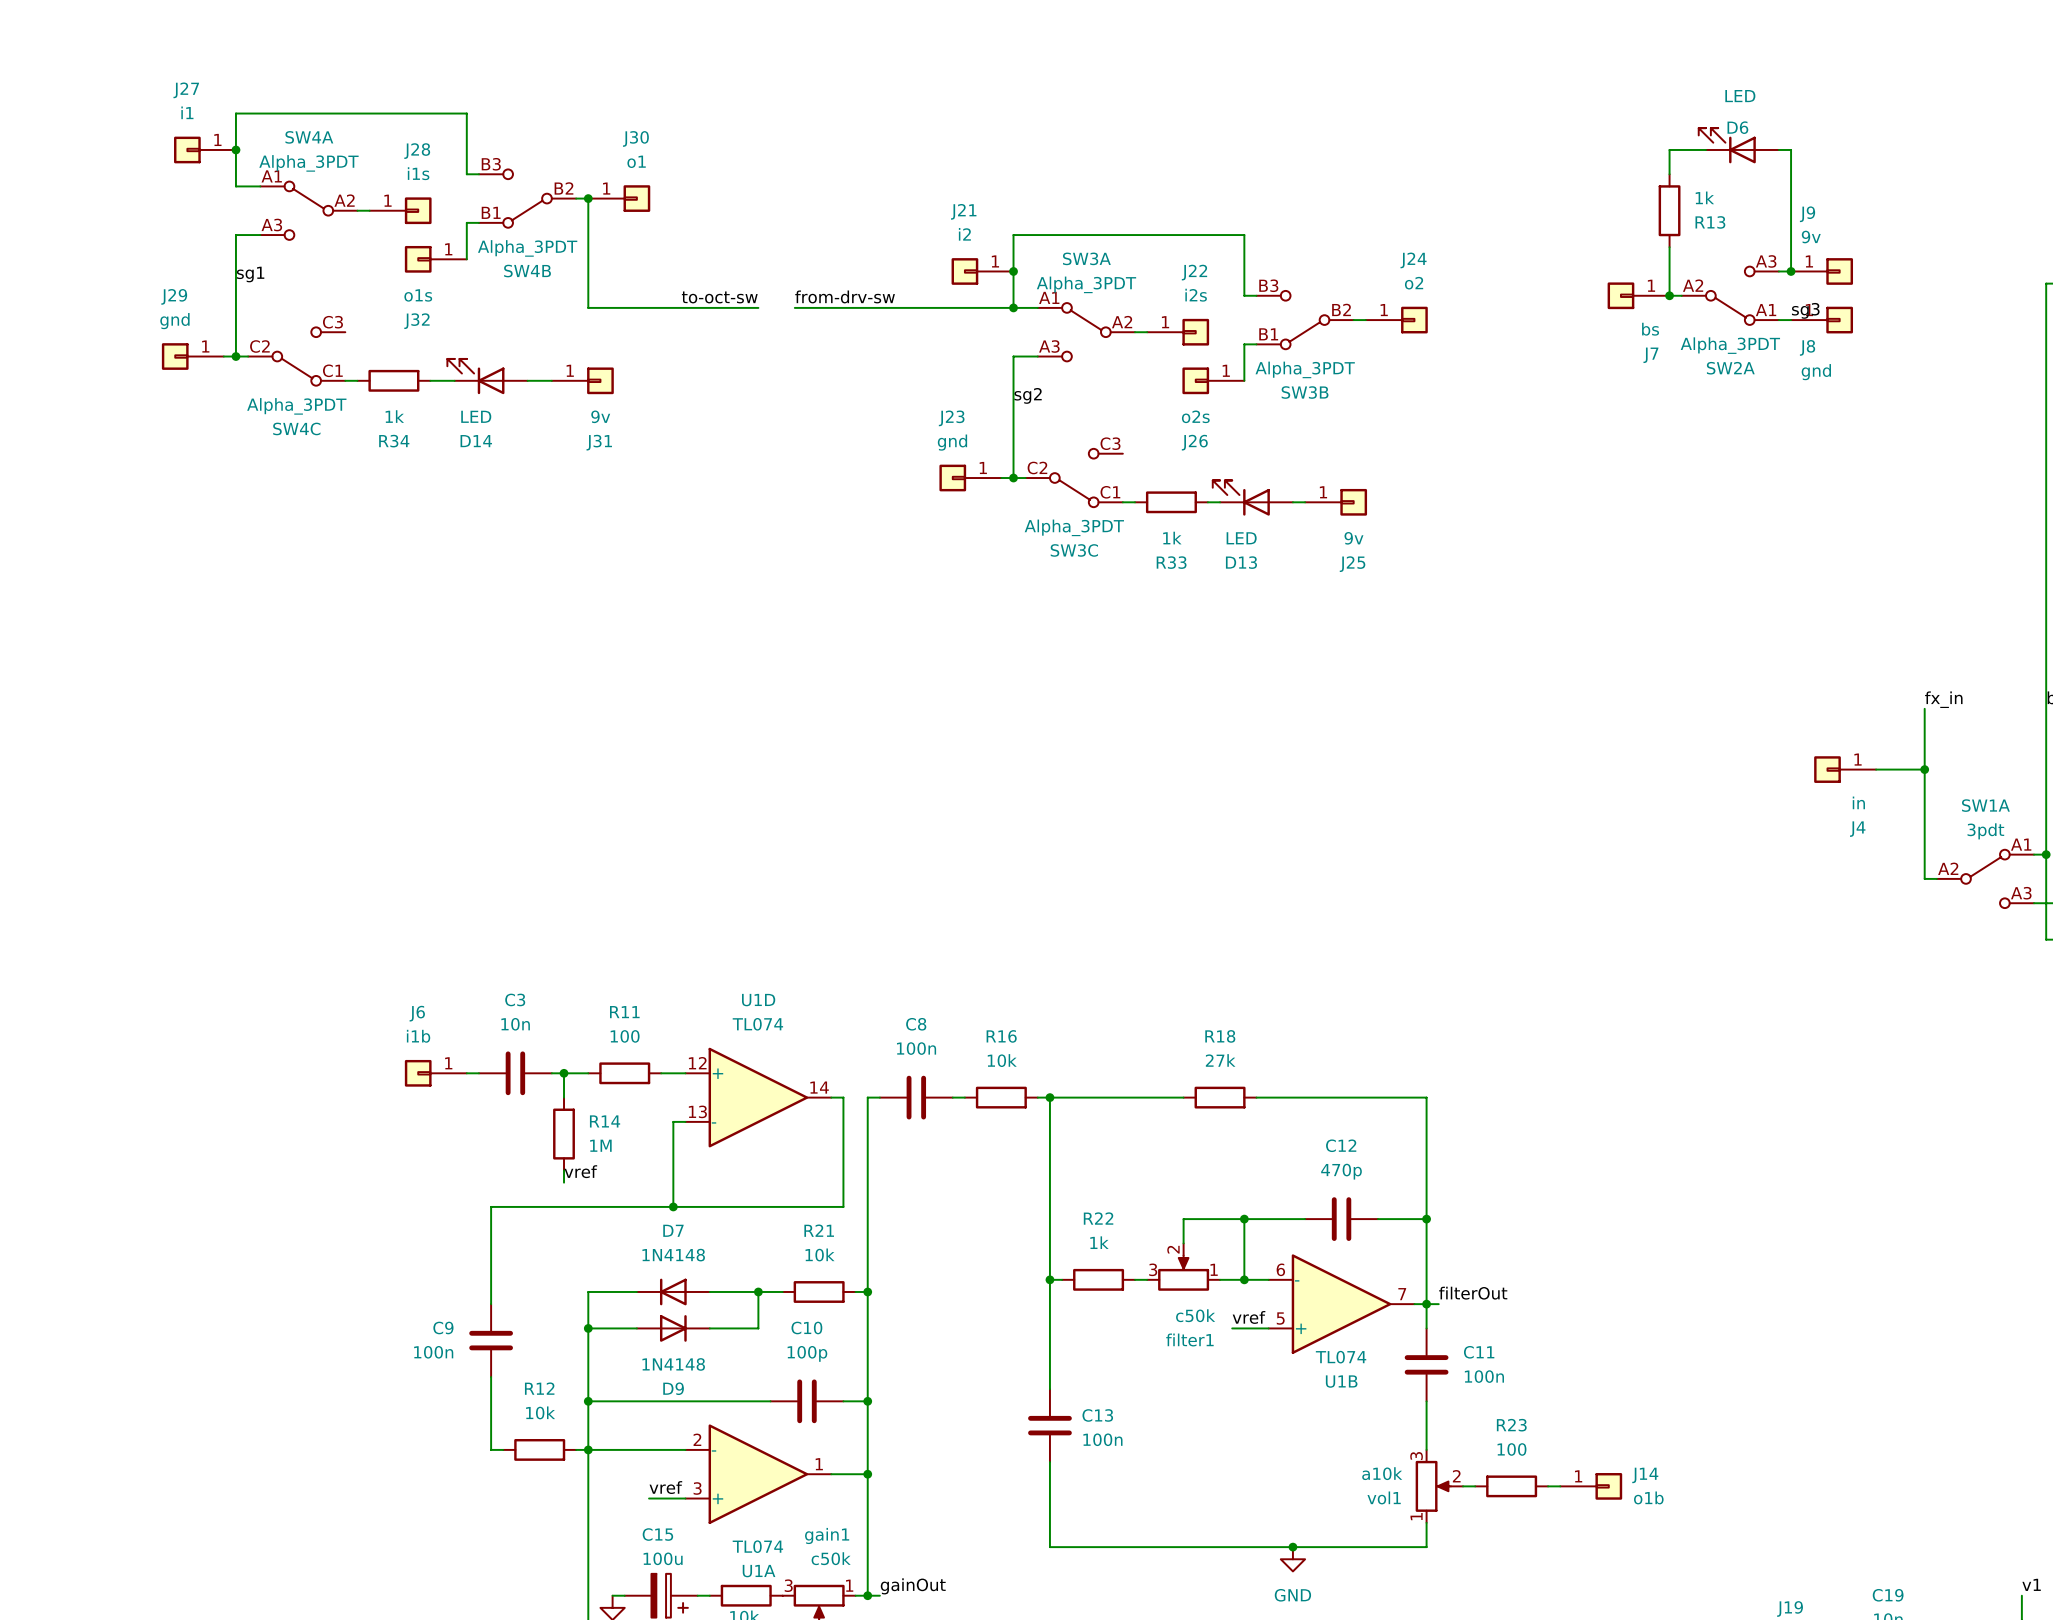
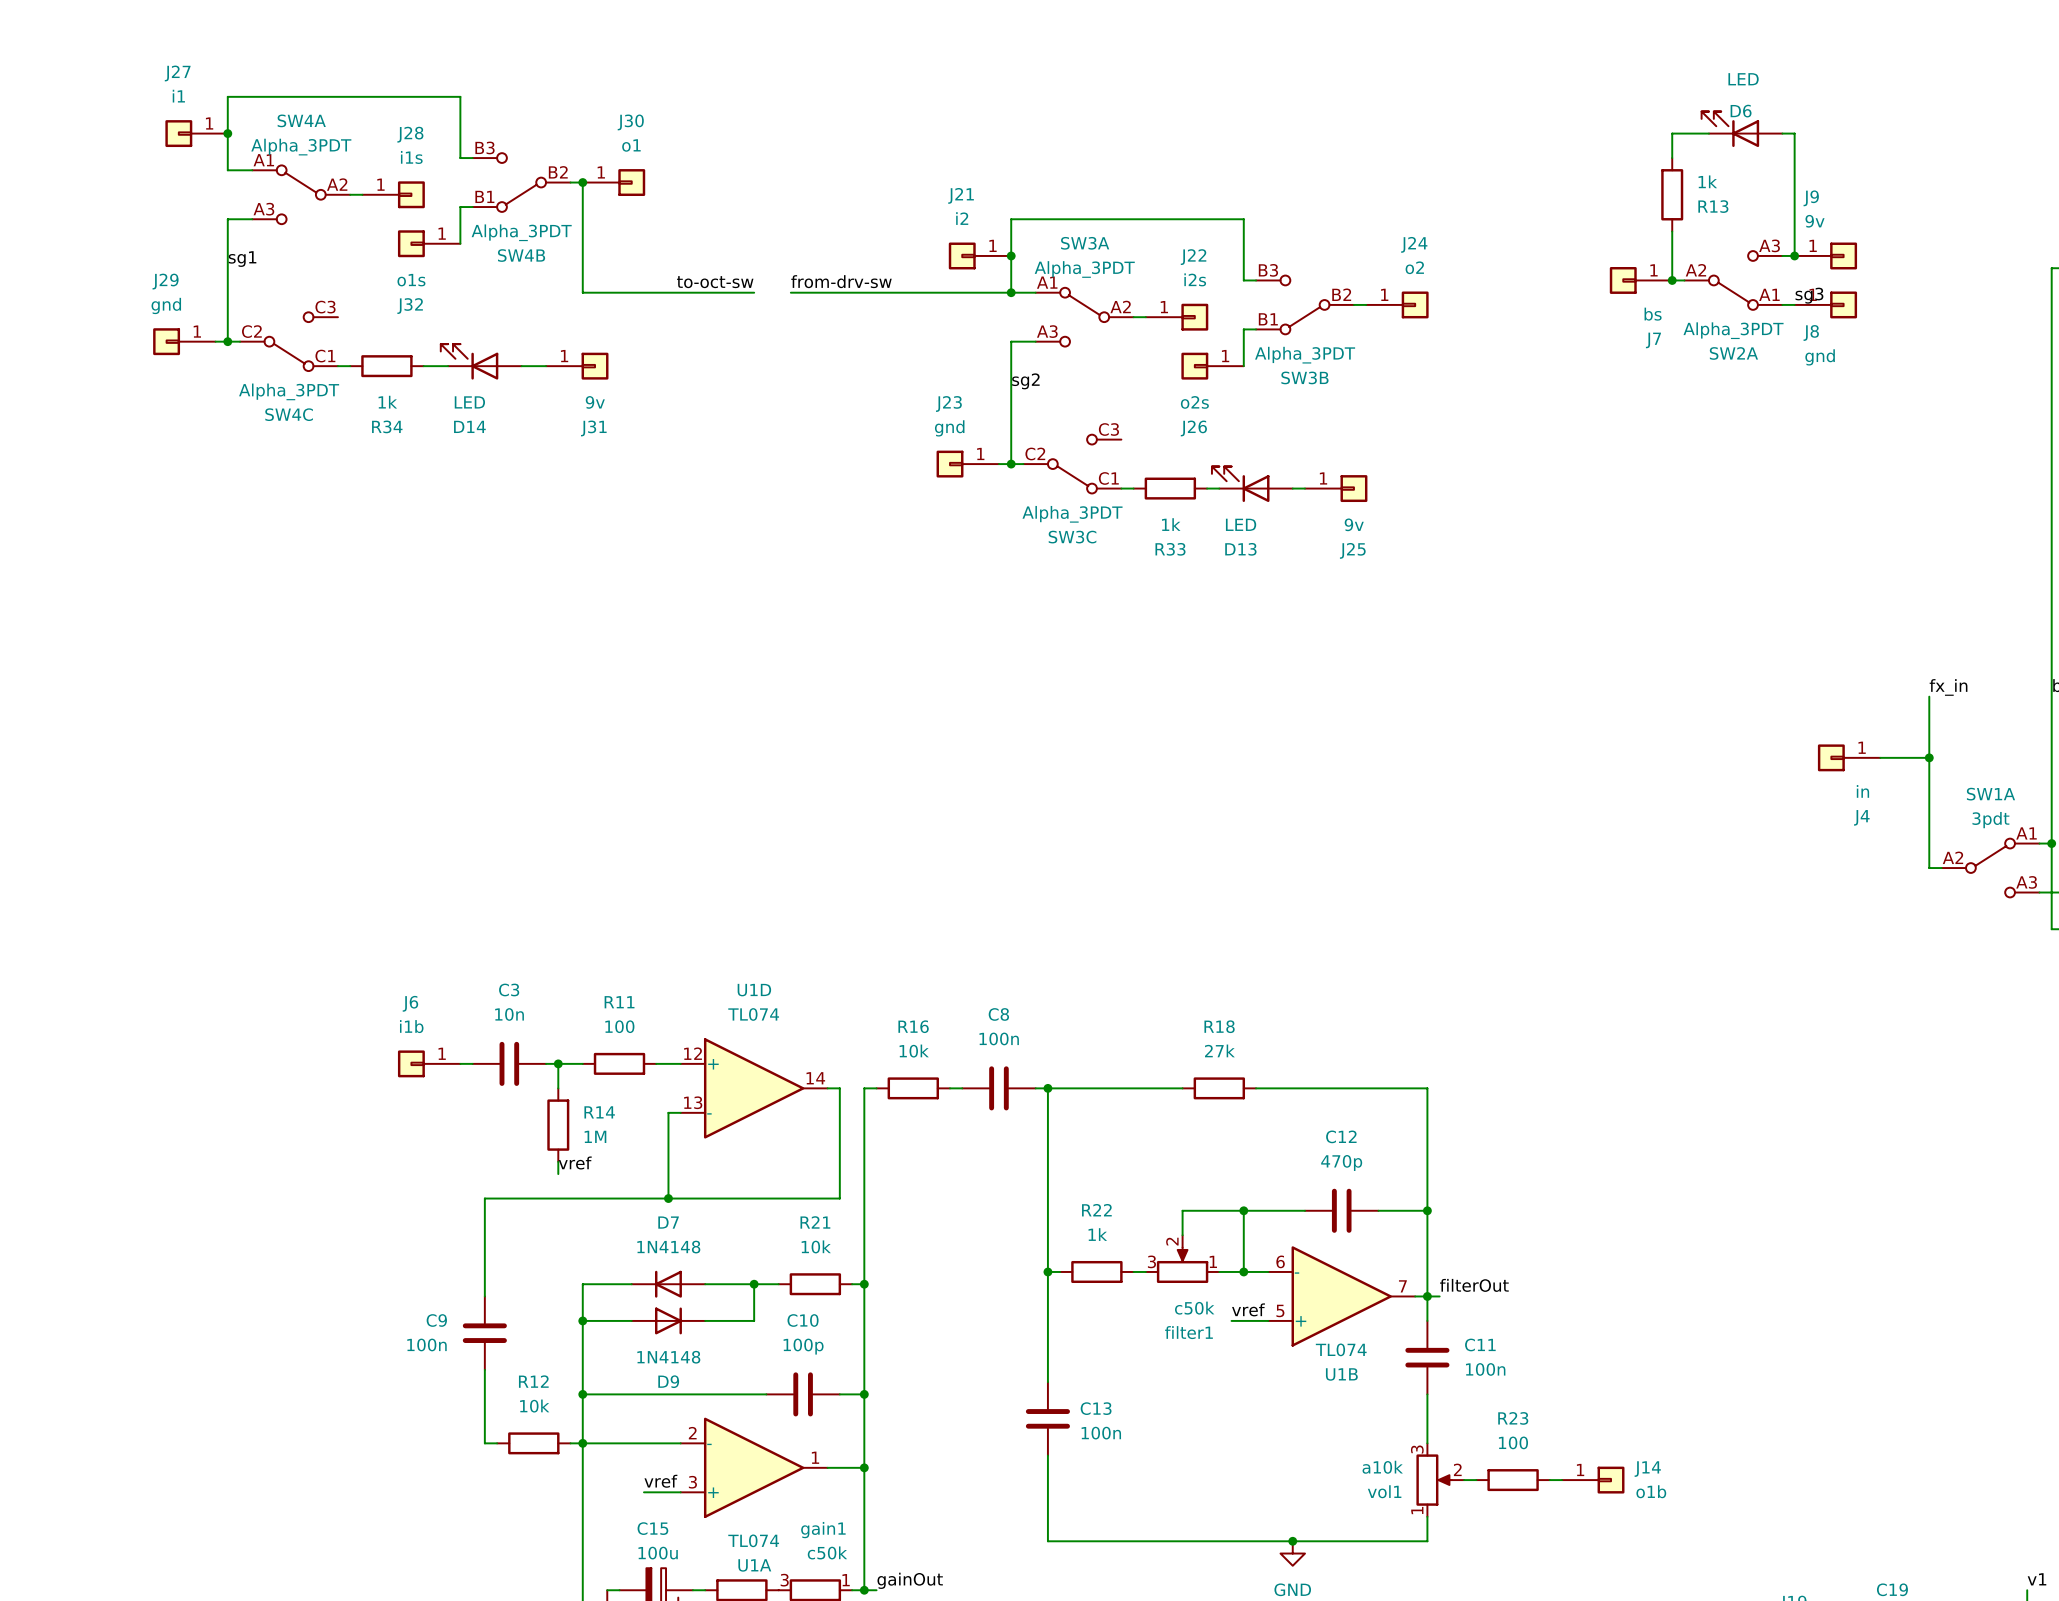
C8 position: (916, 1097) -> (998, 1088)
R16 position: (1001, 1097) -> (913, 1088)

